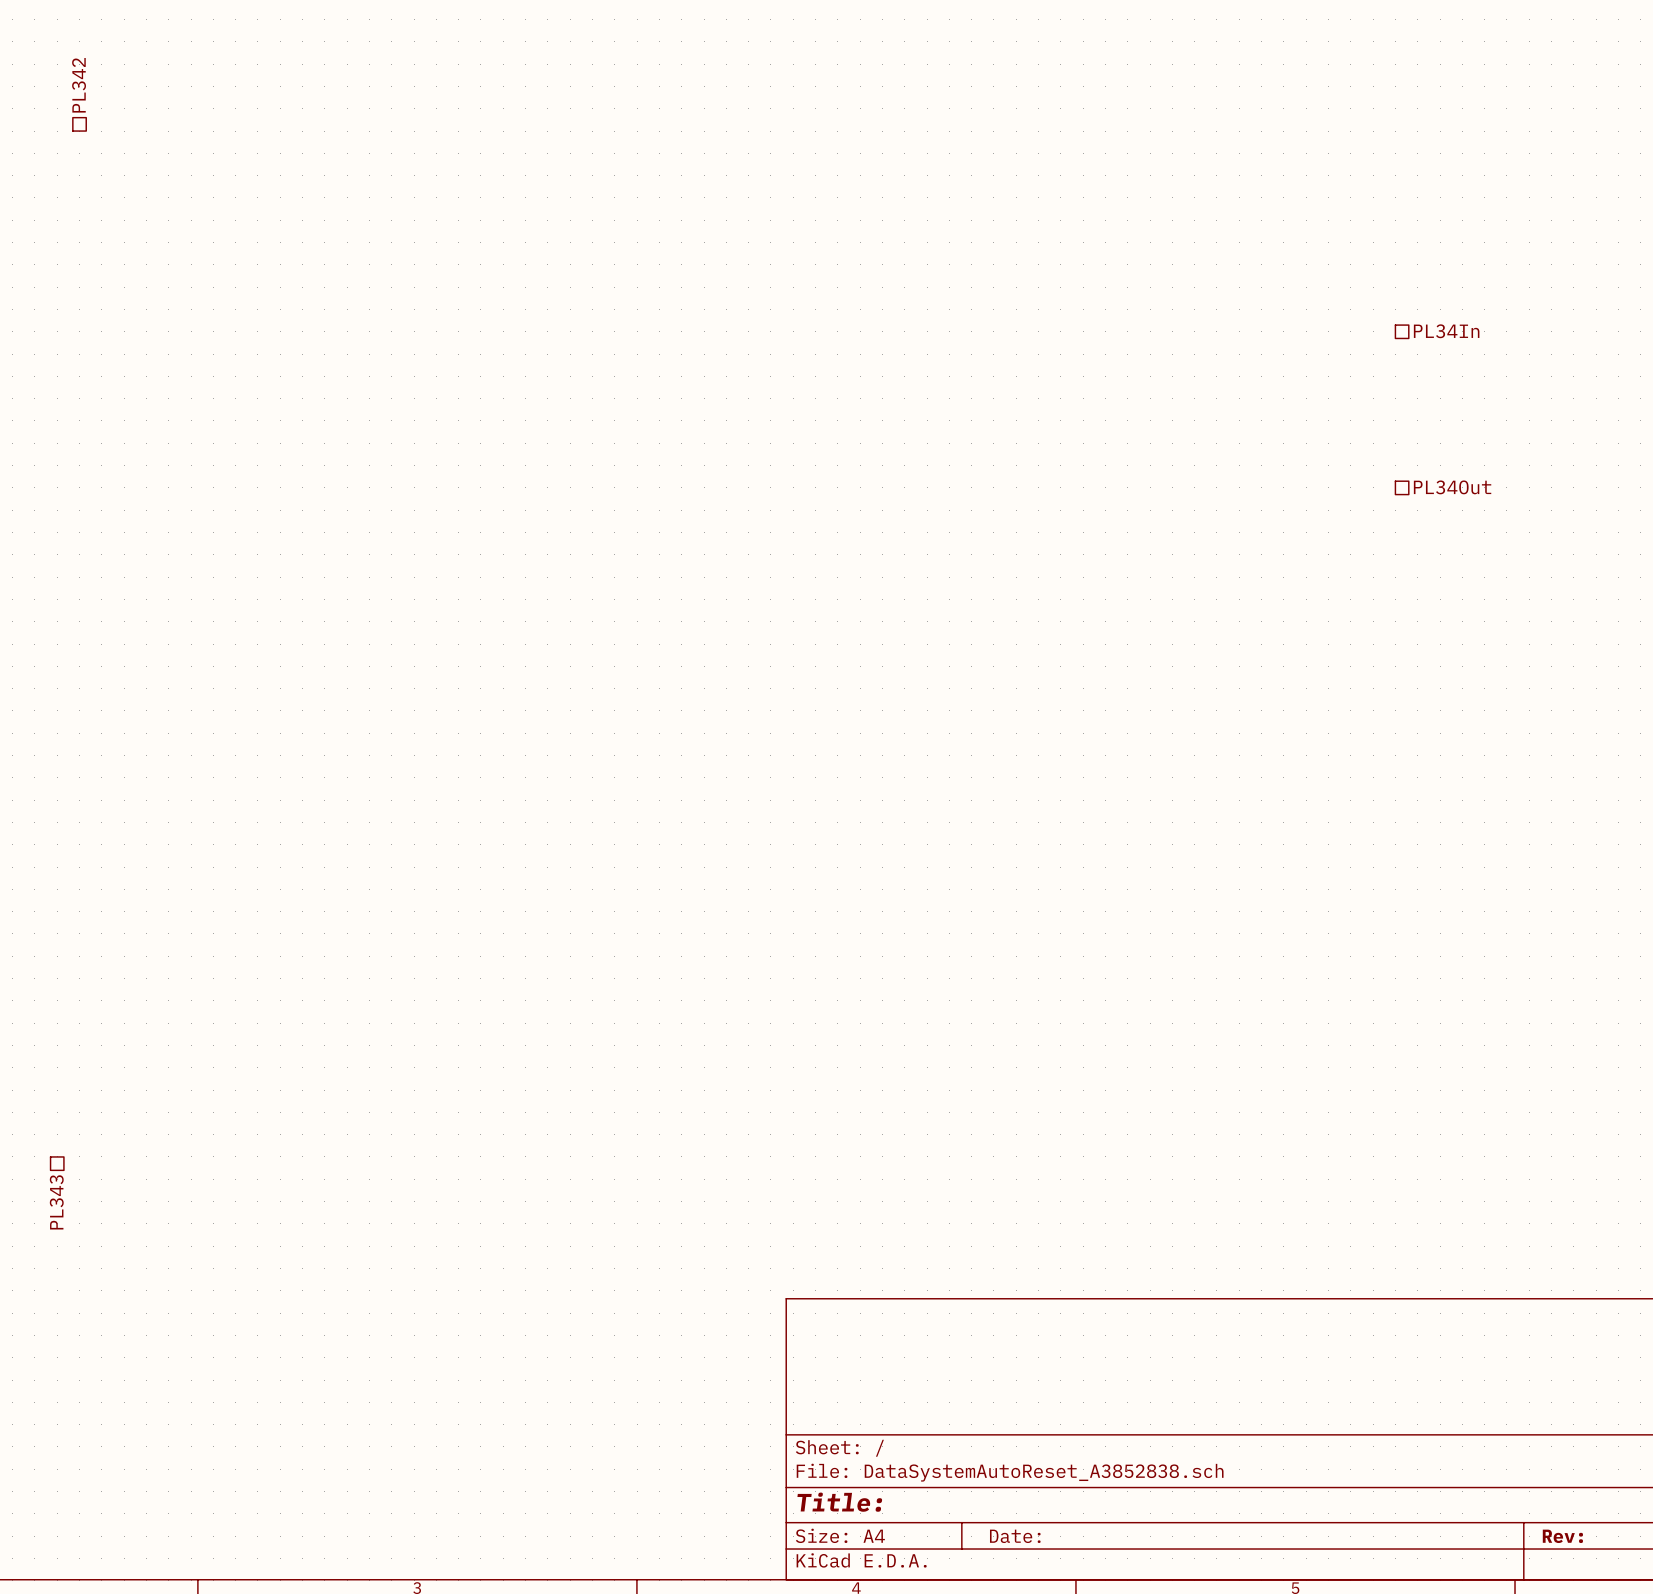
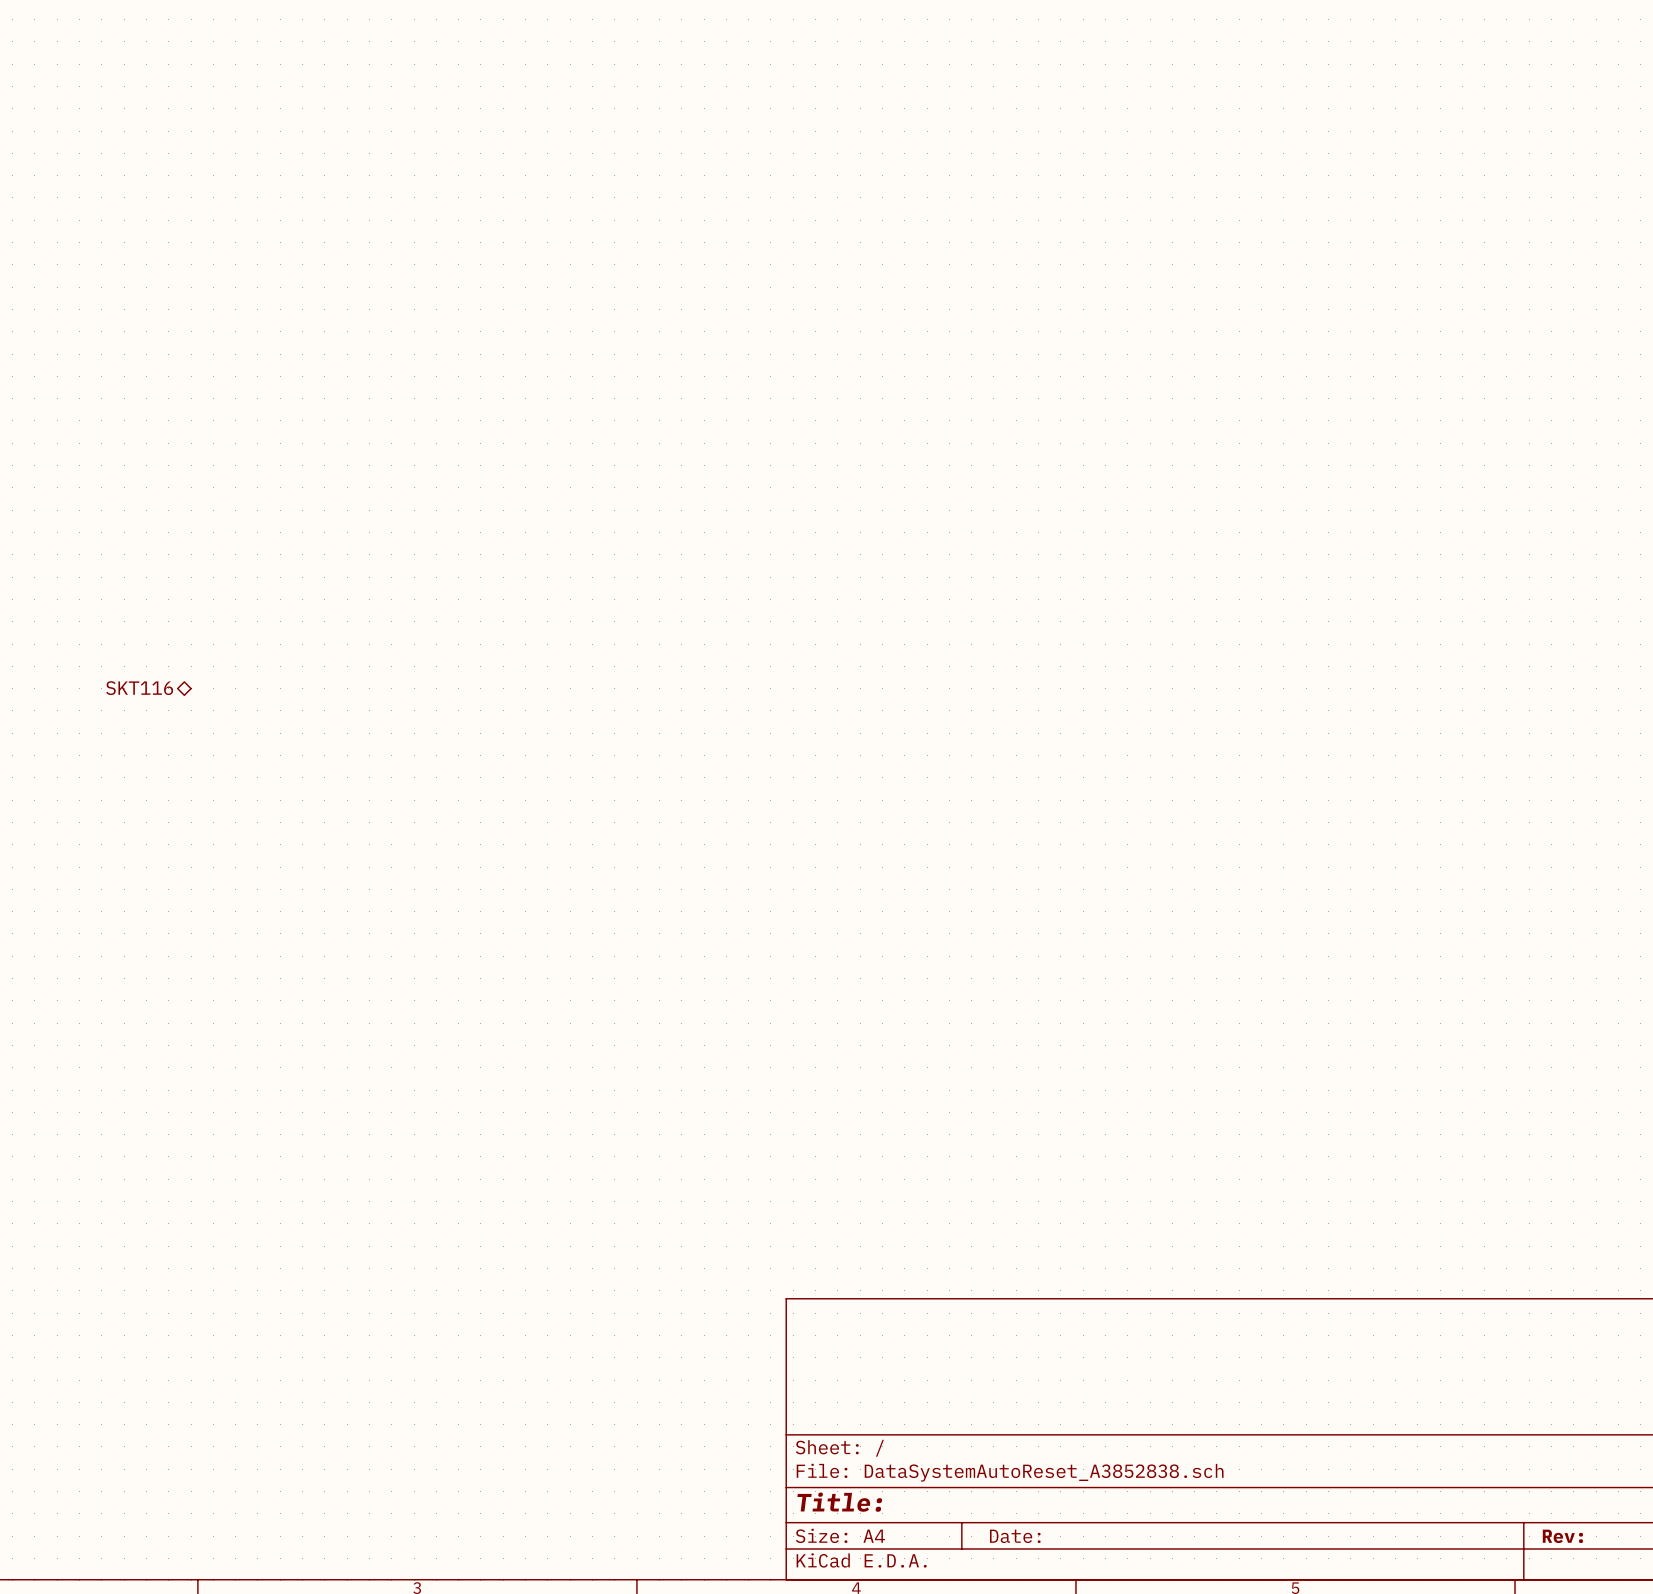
hierarchical label: PL342 (79, 85) -> none
hierarchical label: PL34In (1446, 331) -> none
hierarchical label: PL34Out (1452, 487) -> none
hierarchical label: none -> SKT116 (139, 688)
hierarchical label: PL343 (56, 1202) -> none

